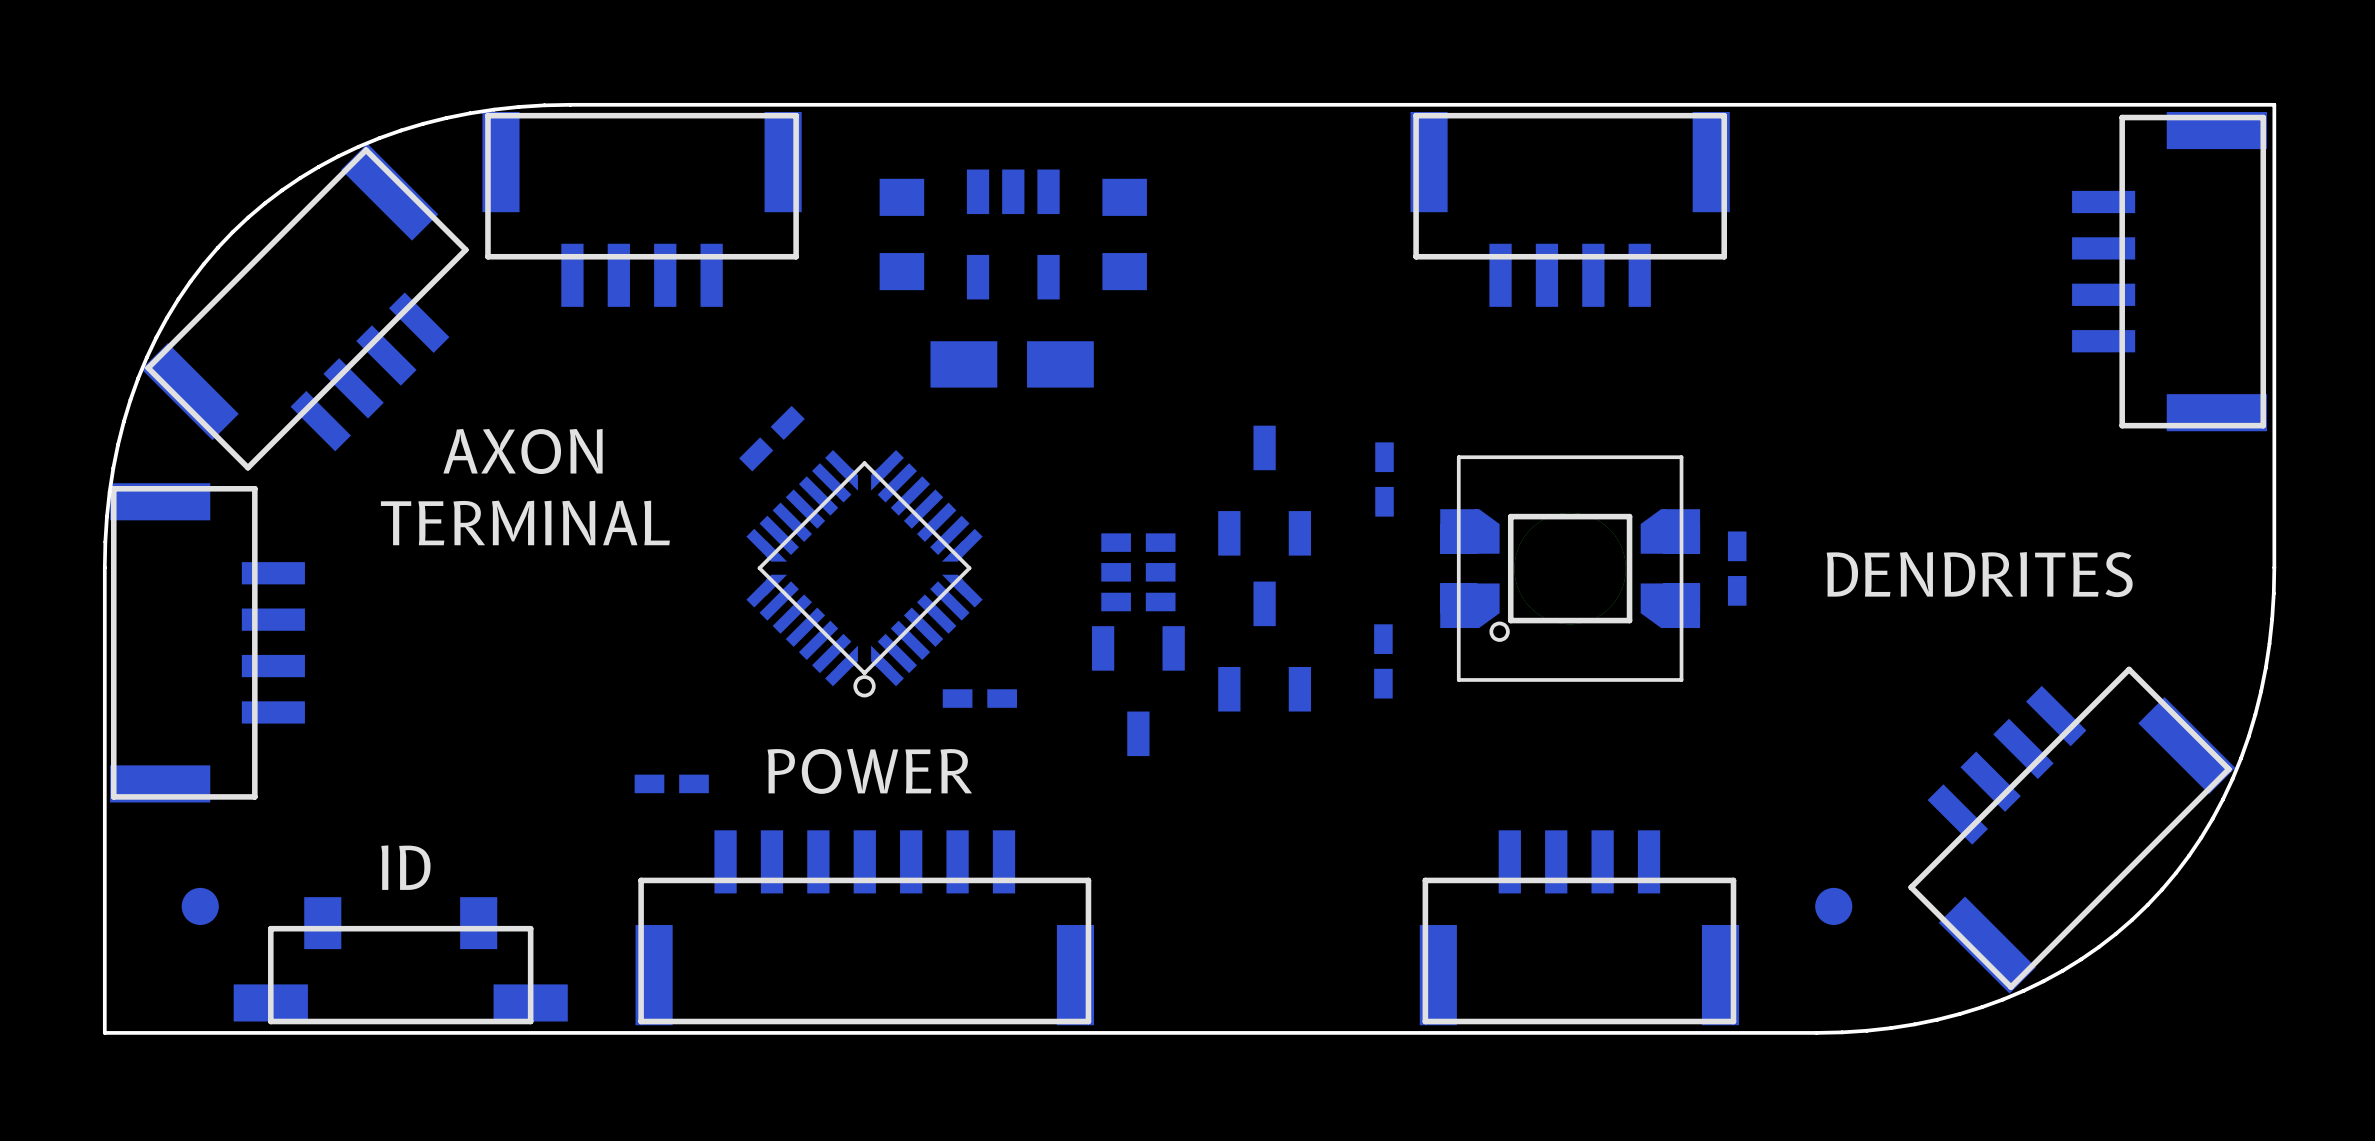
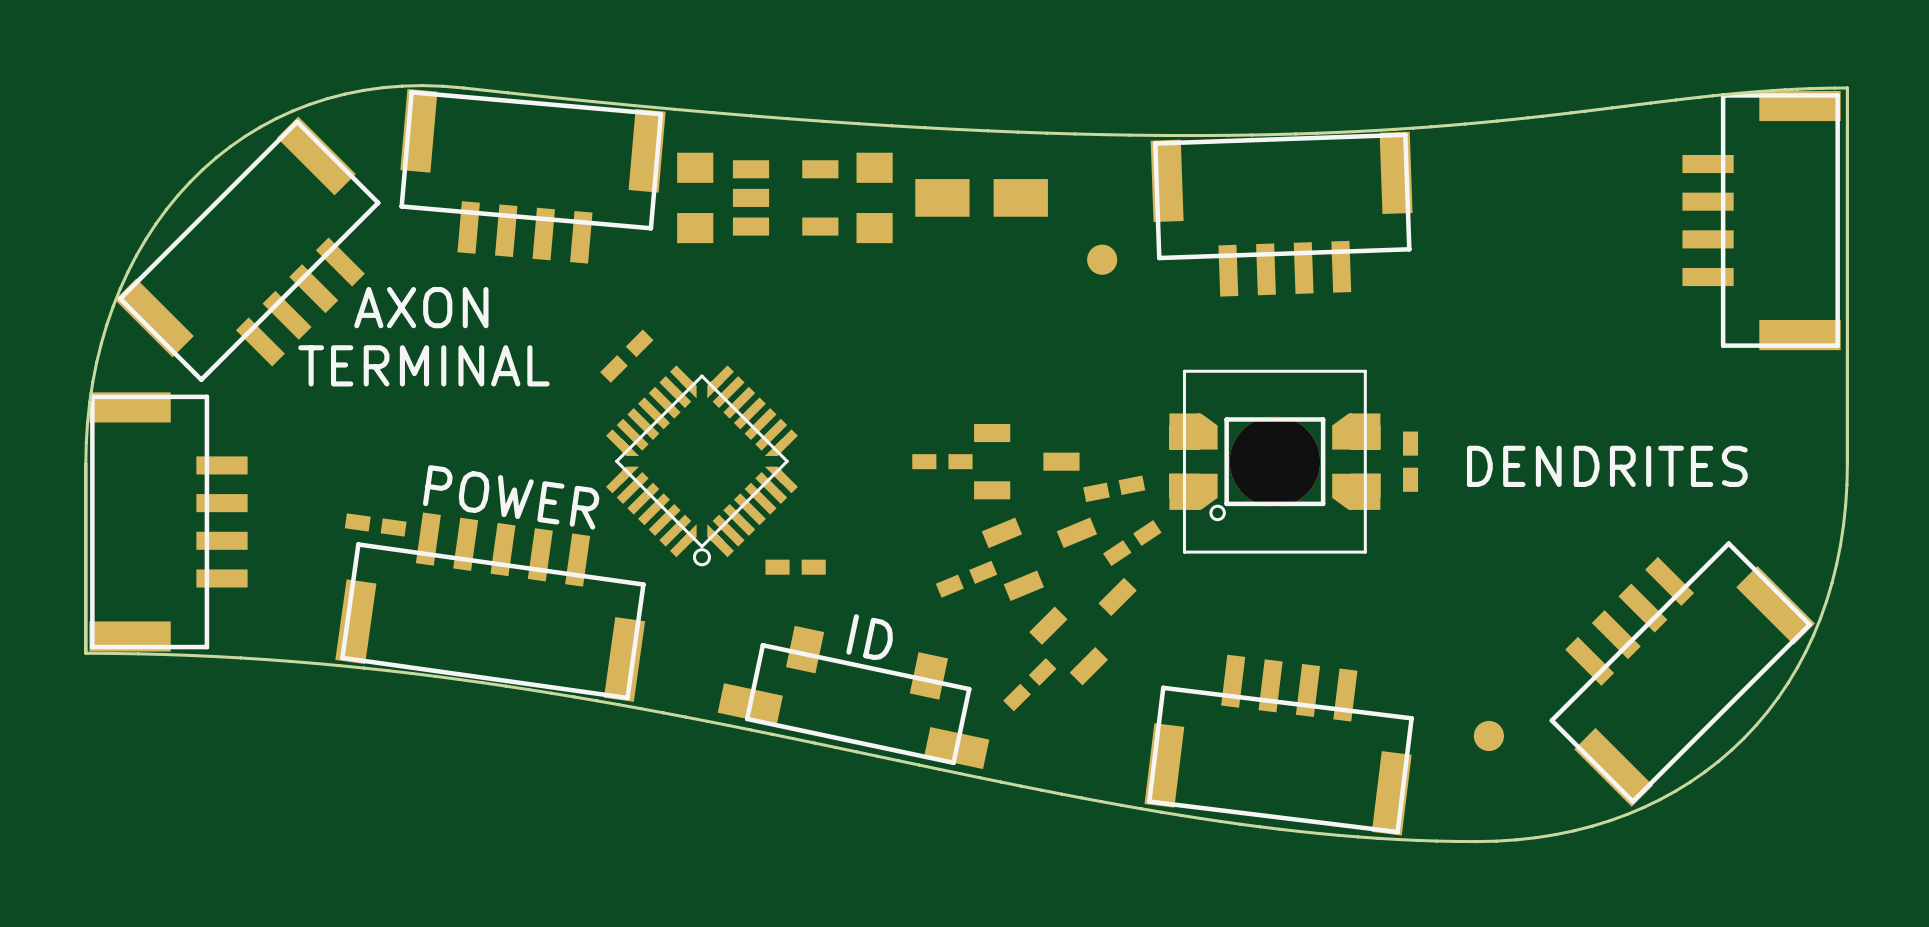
board edge: (2274, 104) (544, 105) (494, 109) (446, 118) (401, 130) (358, 146) (318, 166) (282, 190) (248, 217) (203, 264) (178, 299) (156, 337) (138, 378) (123, 421) (109, 492) (105, 541) (104, 1032) (1842, 1032) (1890, 1028) (1937, 1019) (1981, 1007) (2023, 990) (2062, 970) (2098, 947) (2147, 905) (2176, 873) (2201, 837) (2222, 799) (2241, 758) (2255, 714) (2269, 643) (2273, 593) (2274, 104) -> (422, 85) (713, 112) (858, 123) (1017, 132) (1180, 135) (1295, 133) (1413, 128) (1527, 117) (1736, 93) (1847, 88) (1846, 484) (1840, 545) (1832, 582) (1820, 618) (1797, 667) (1767, 711) (1731, 749) (1690, 781) (1643, 807) (1592, 826) (1536, 837) (1475, 841) (1338, 835) (1181, 815) (1041, 790) (663, 712) (459, 679) (364, 668) (265, 659) (164, 654) (85, 653) (85, 463) (89, 401) (96, 362) (106, 324) (120, 288) (145, 239) (178, 195) (202, 169) (230, 146) (260, 127) (309, 104) (345, 94) (382, 87) (422, 85)
part rotation: 0° (642, 209) -> 5° clockwise (532, 176)
part: (1570, 209) -> none
part position: (901, 234) -> (695, 197)
part rotation: 0° (1013, 234) -> 90° counterclockwise (785, 197)
part position: (1124, 234) -> (874, 197)
part: none -> (1281, 214)
part: none -> (1102, 259)
part position: (1012, 364) -> (981, 197)
text: none -> AXON (421, 307)
text: AXON (523, 451) -> TERMINAL (423, 365)
part: (1384, 479) -> none
part: (1264, 490) -> none
text: TERMINAL (525, 522) -> none
part: (1138, 542) -> none
part: none -> (942, 461)
part: none -> (1026, 461)
part: (1138, 572) -> none
part: (1138, 602) -> none
part: none -> (1114, 488)
part: none -> (375, 524)
part: (1264, 646) -> none
part rotation: 0° (1383, 661) -> 56.3° clockwise (1132, 543)
part: none -> (1039, 559)
part: (1138, 691) -> none
part: none -> (966, 579)
part: none -> (490, 607)
text rotation: 0° (869, 771) -> 8° clockwise (511, 497)
text position: POWER (869, 771) -> POWER (511, 497)
part: none -> (1083, 631)
part: (671, 783) -> none
part: none -> (1029, 684)
part: none -> (853, 697)
text rotation: 0° (405, 867) -> 12° clockwise (869, 637)
text position: ID (405, 867) -> ID (869, 637)
part: (200, 906) -> none
part: (864, 927) -> none
part rotation: 0° (1579, 927) -> 7° clockwise (1279, 745)
part: (400, 960) -> none

